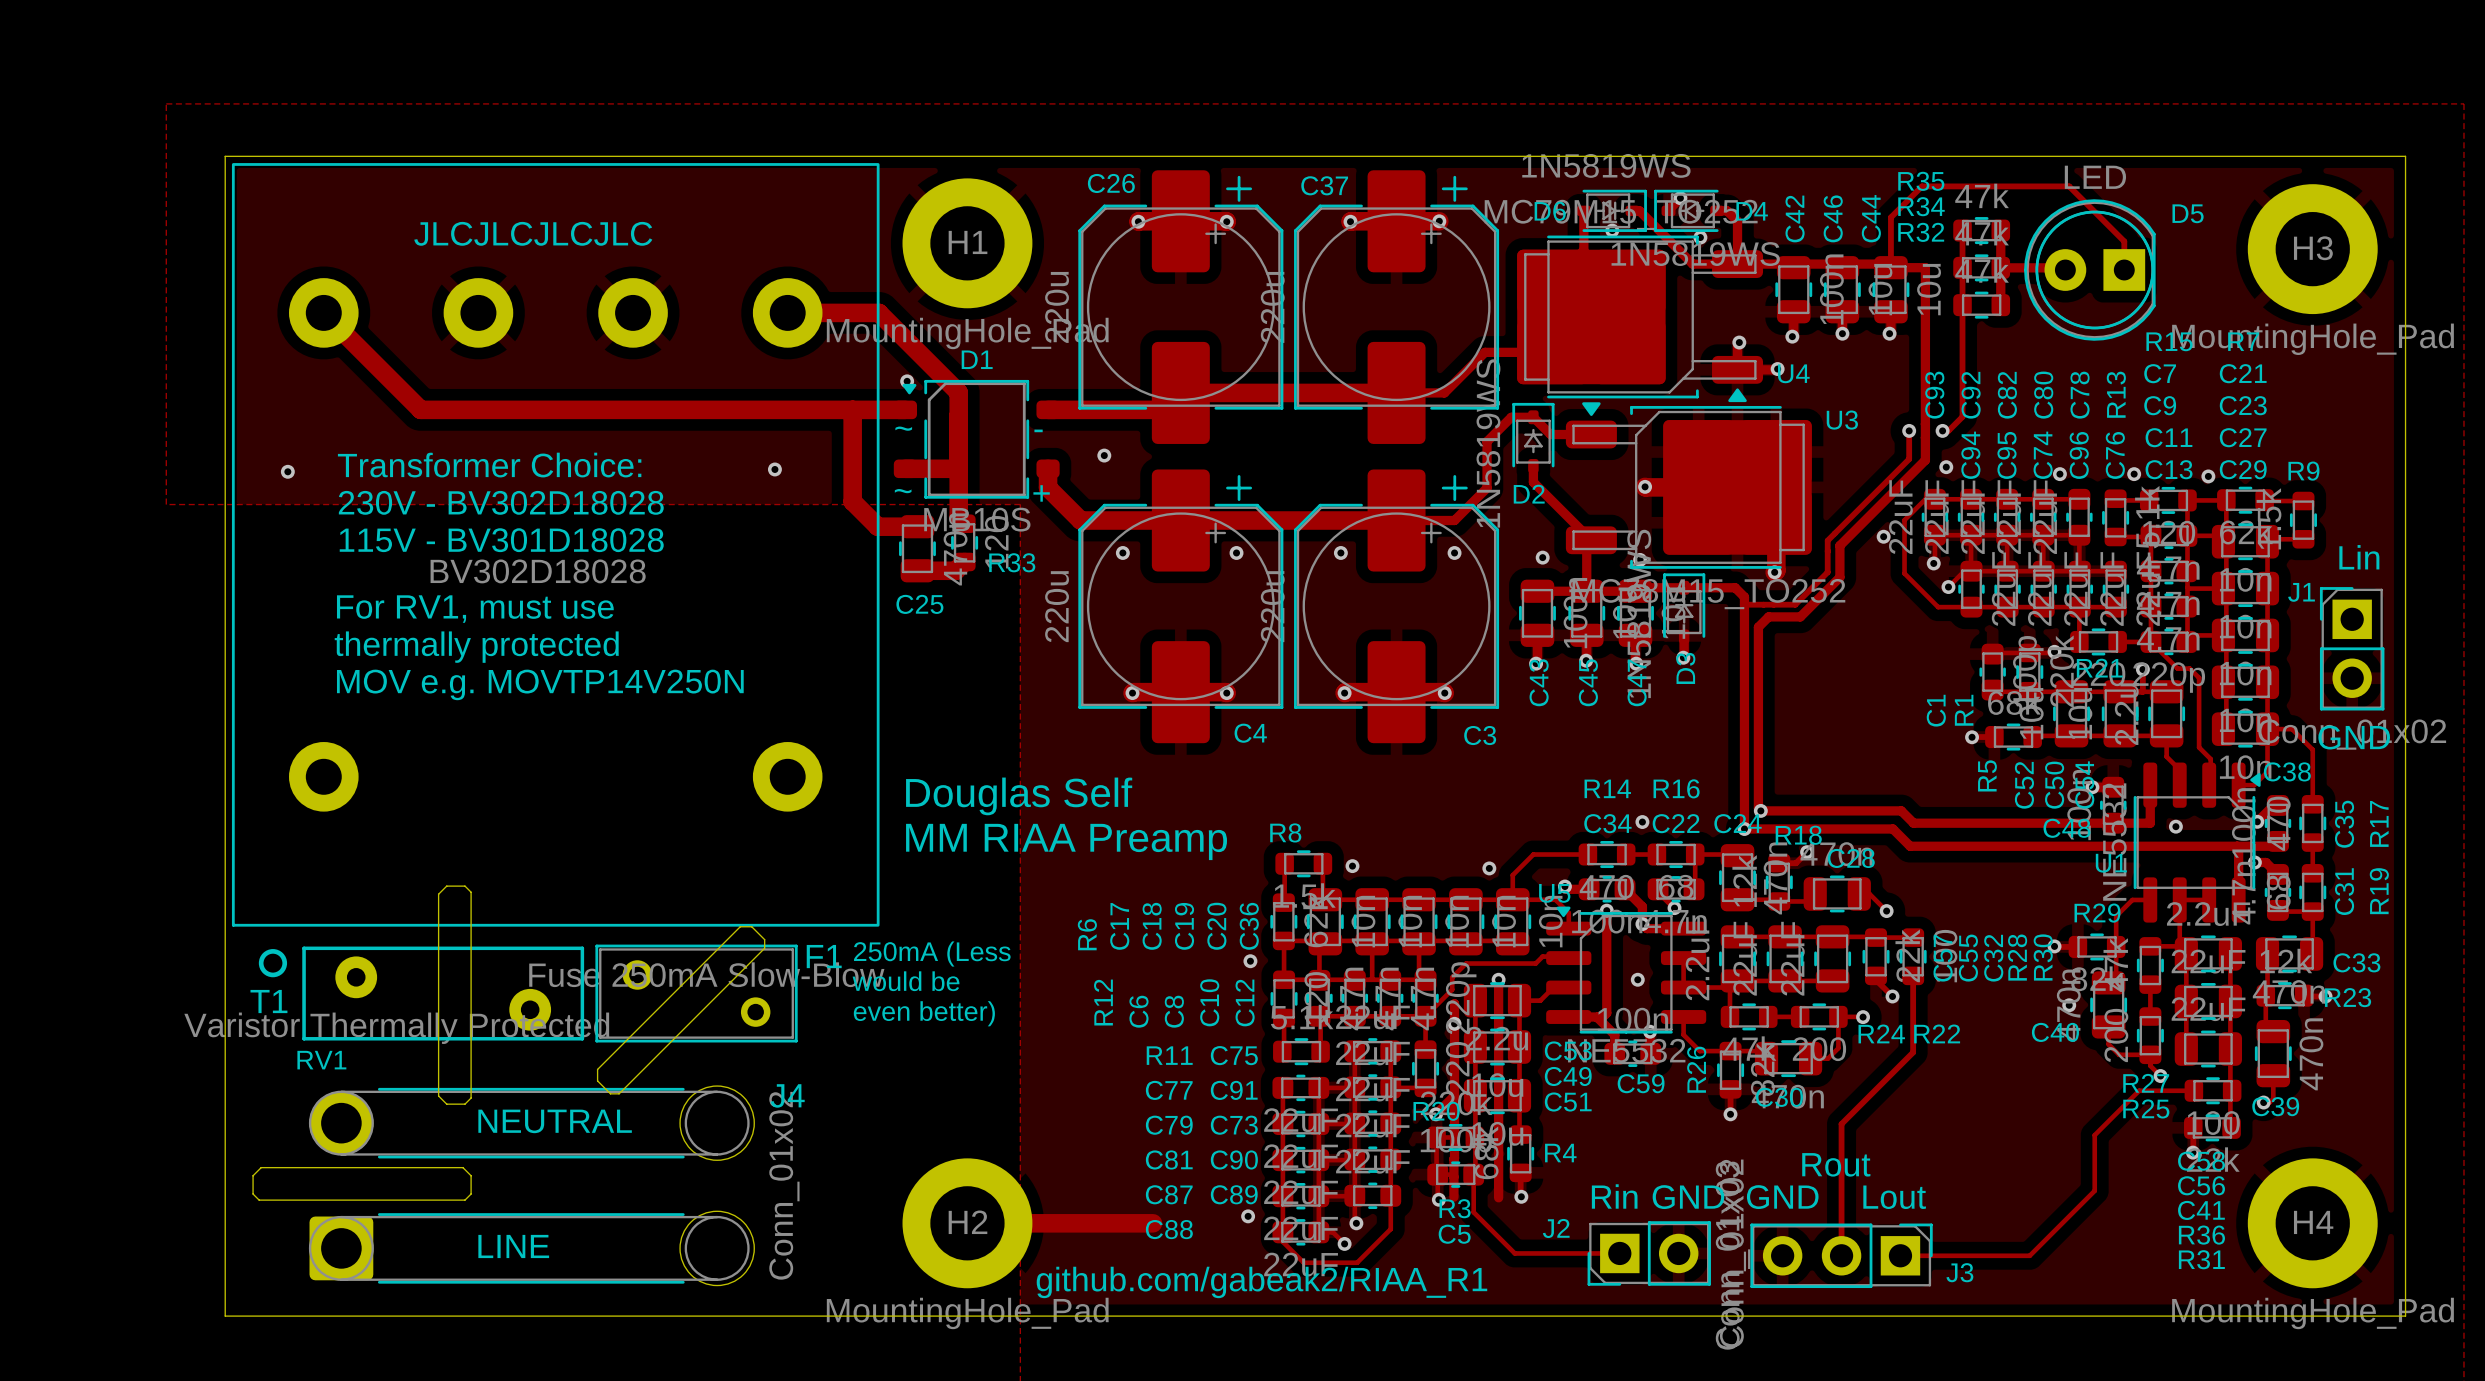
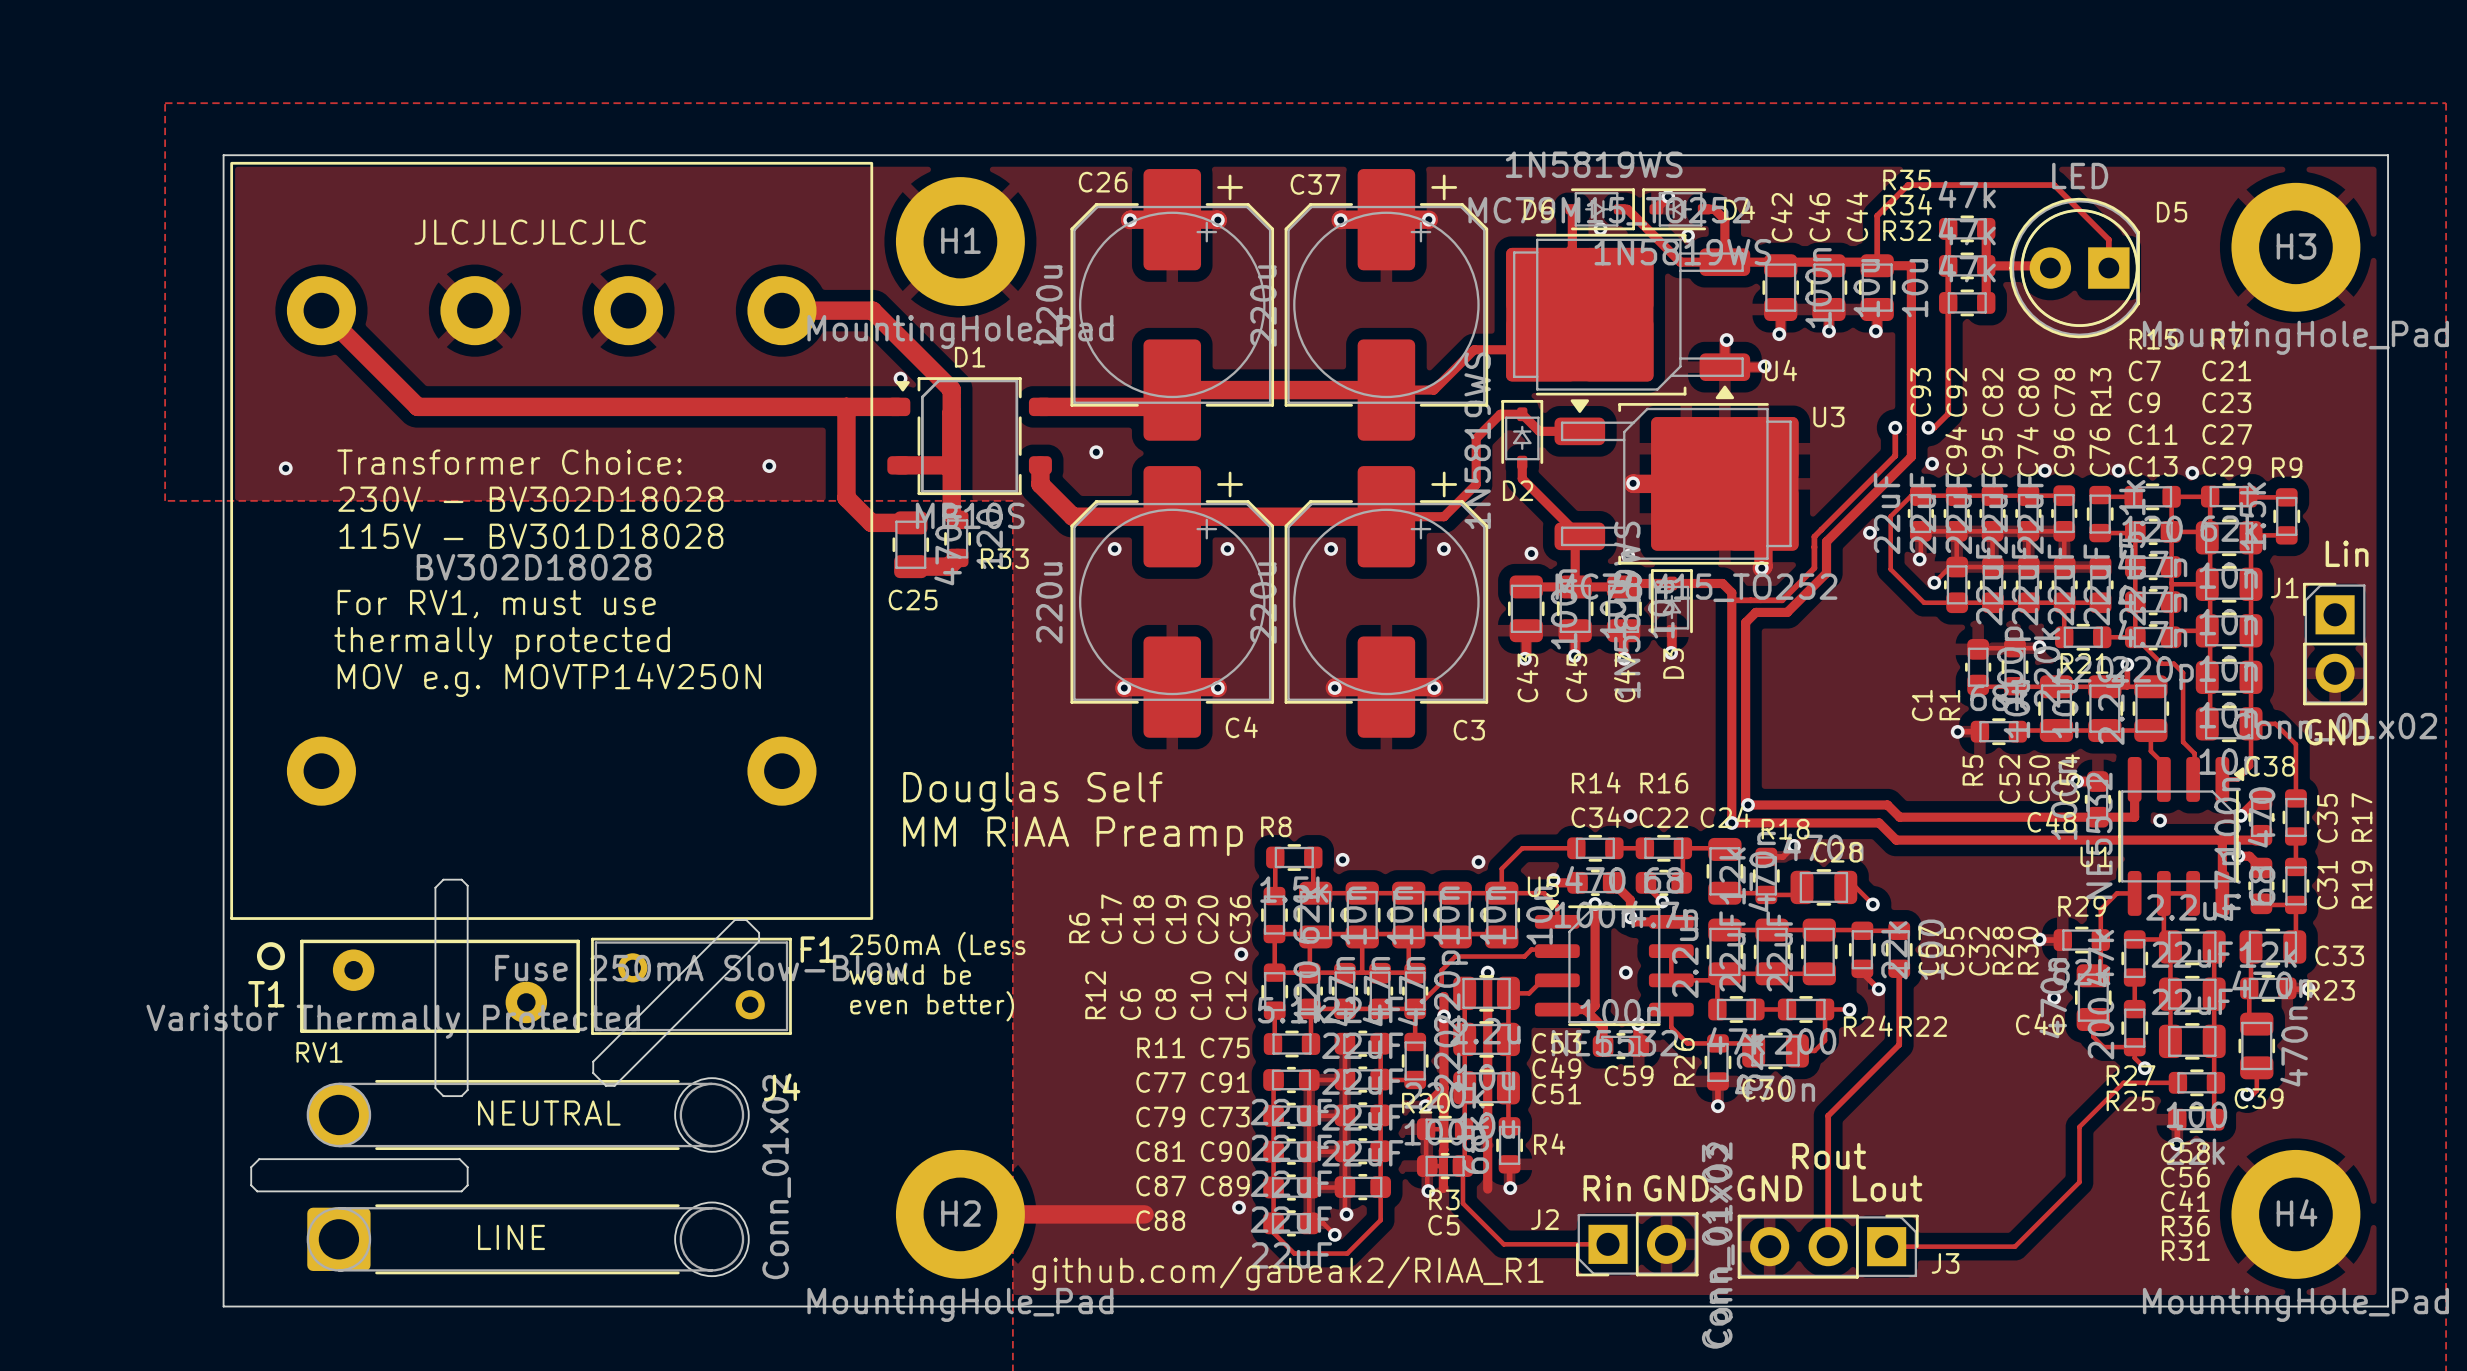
text: ~ (903, 428) -> none
text: - (1038, 430) -> none
text: ~ (903, 491) -> none
text: + (1041, 493) -> none

